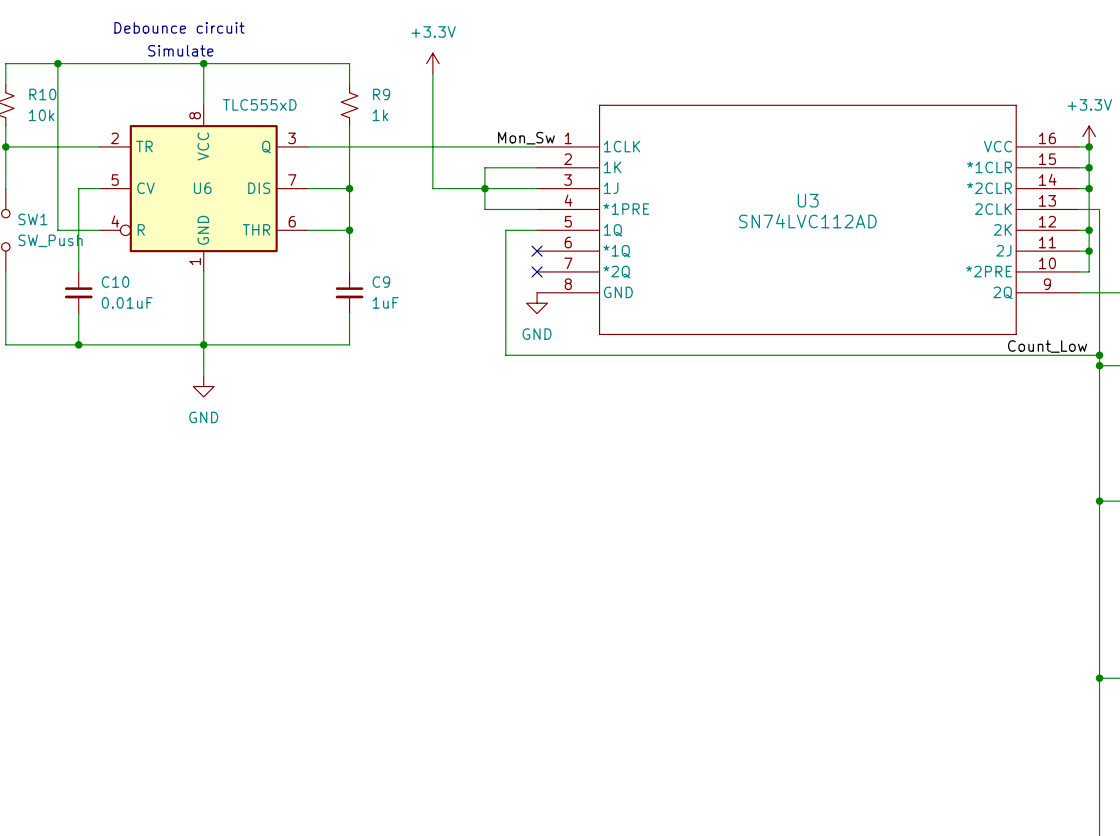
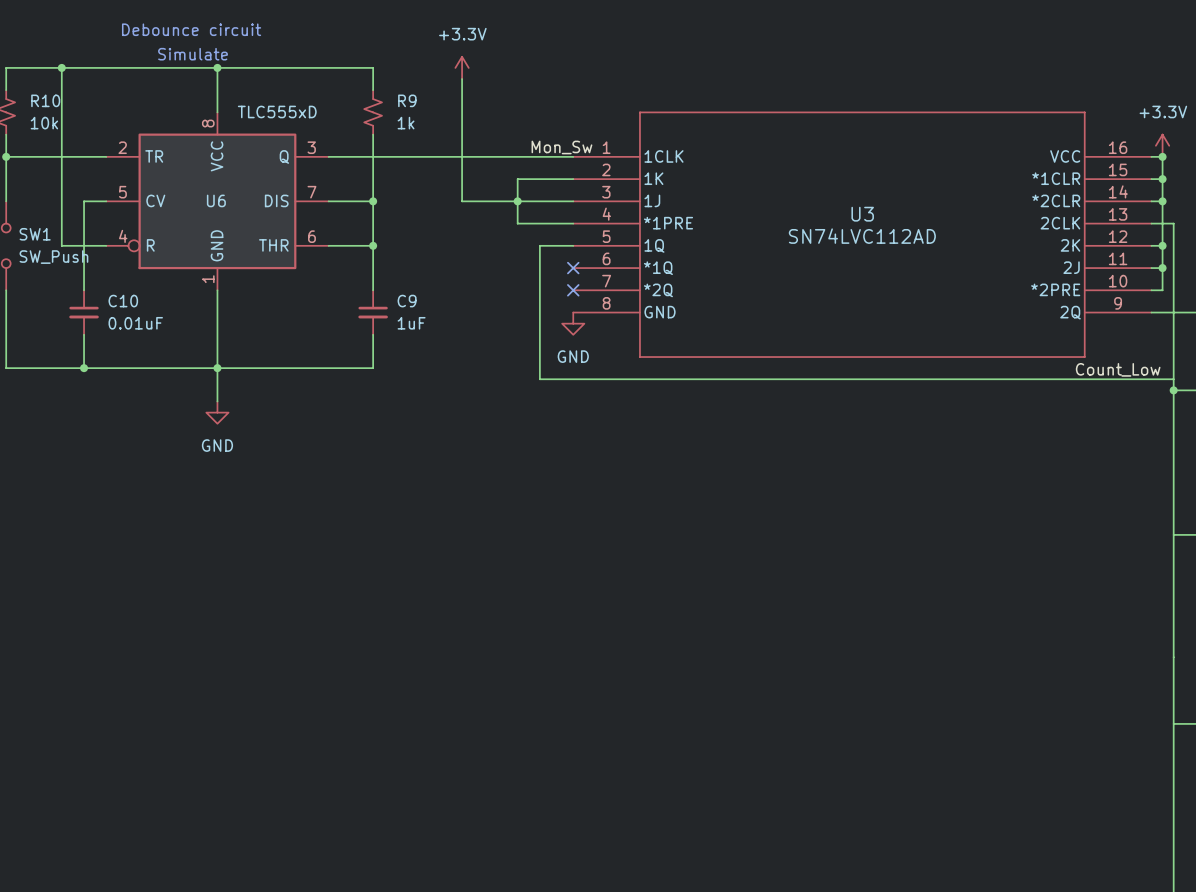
junction: (1099, 355) -> none
junction: (1099, 501) -> none
junction: (1099, 678) -> none

